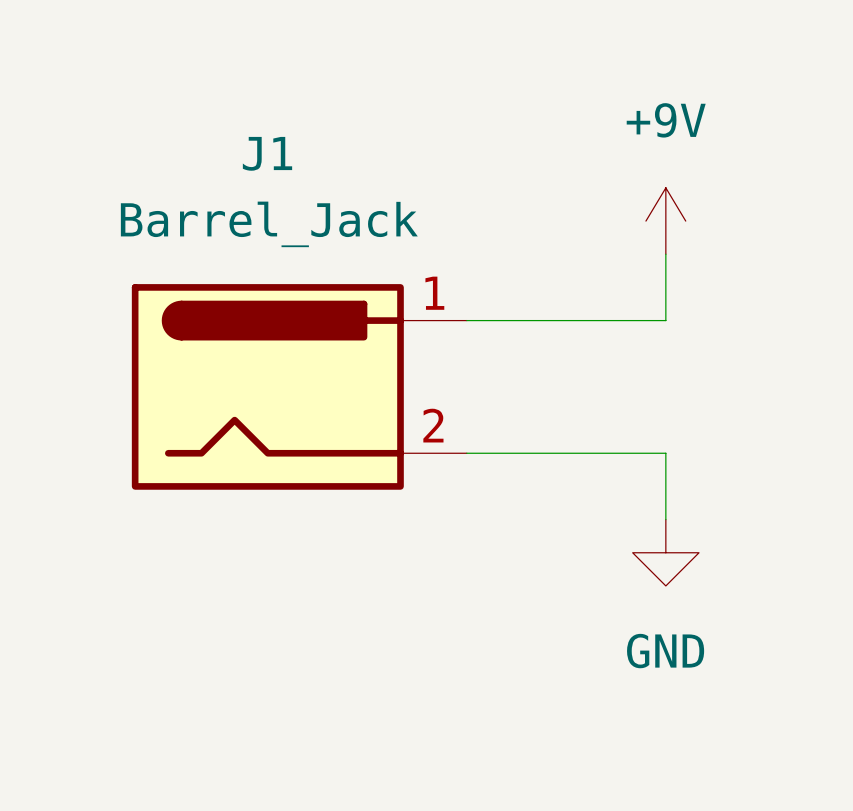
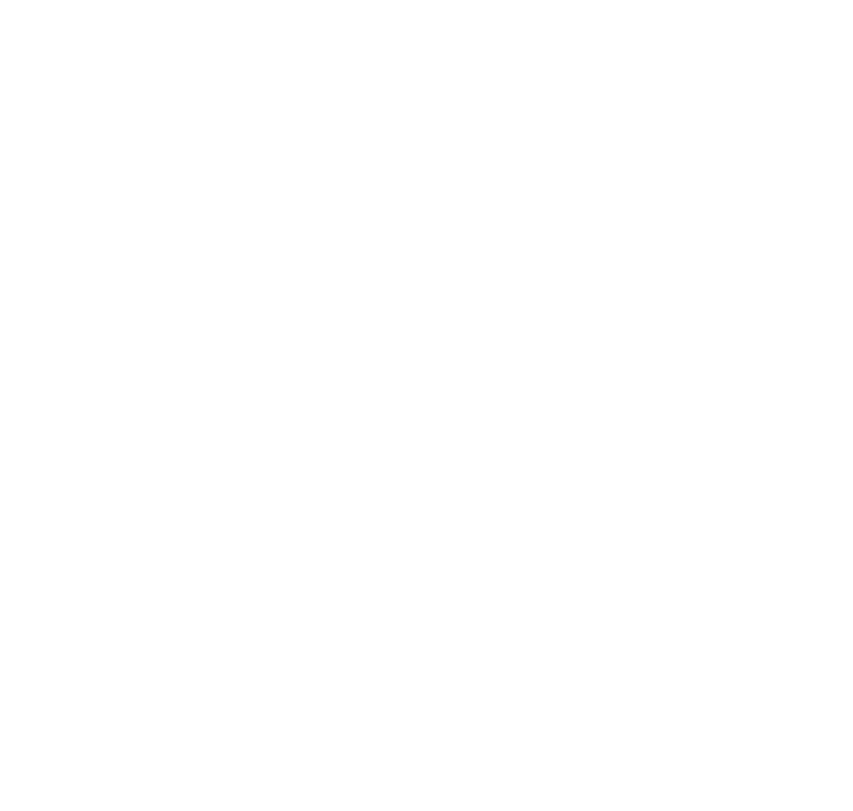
power symbol: +9V (665, 221) -> none
wire: (665, 254) (665, 320) (466, 320) -> none
J1: Barrel_Jack (299, 386) -> none
wire: (466, 453) (665, 453) (665, 519) -> none
power symbol: GND (665, 552) -> none

